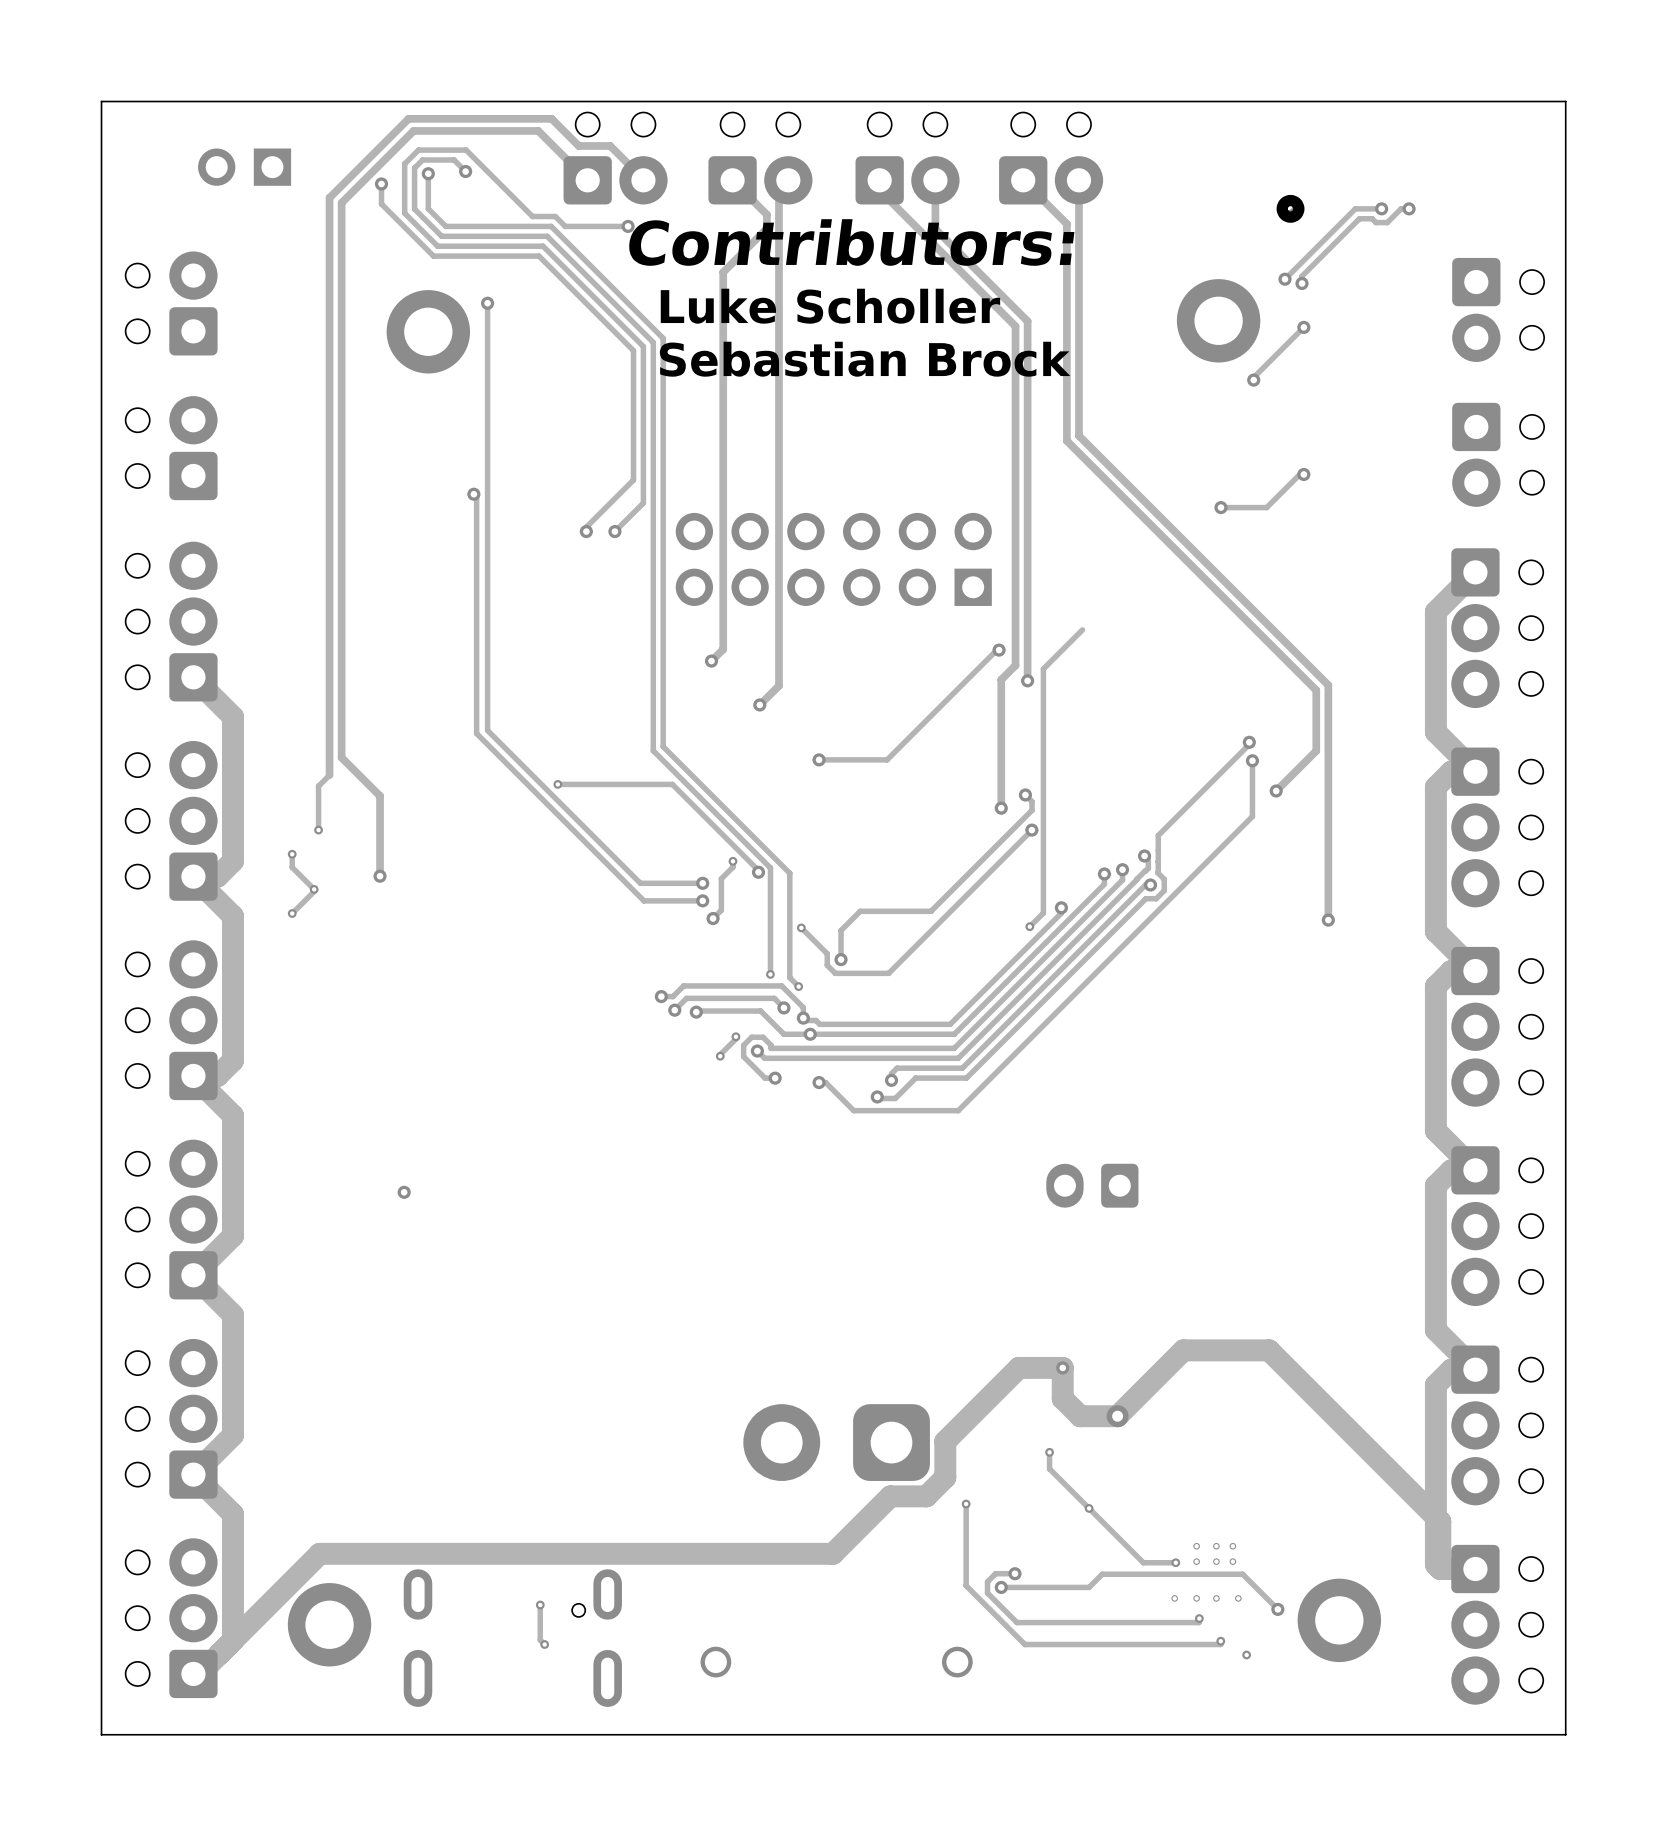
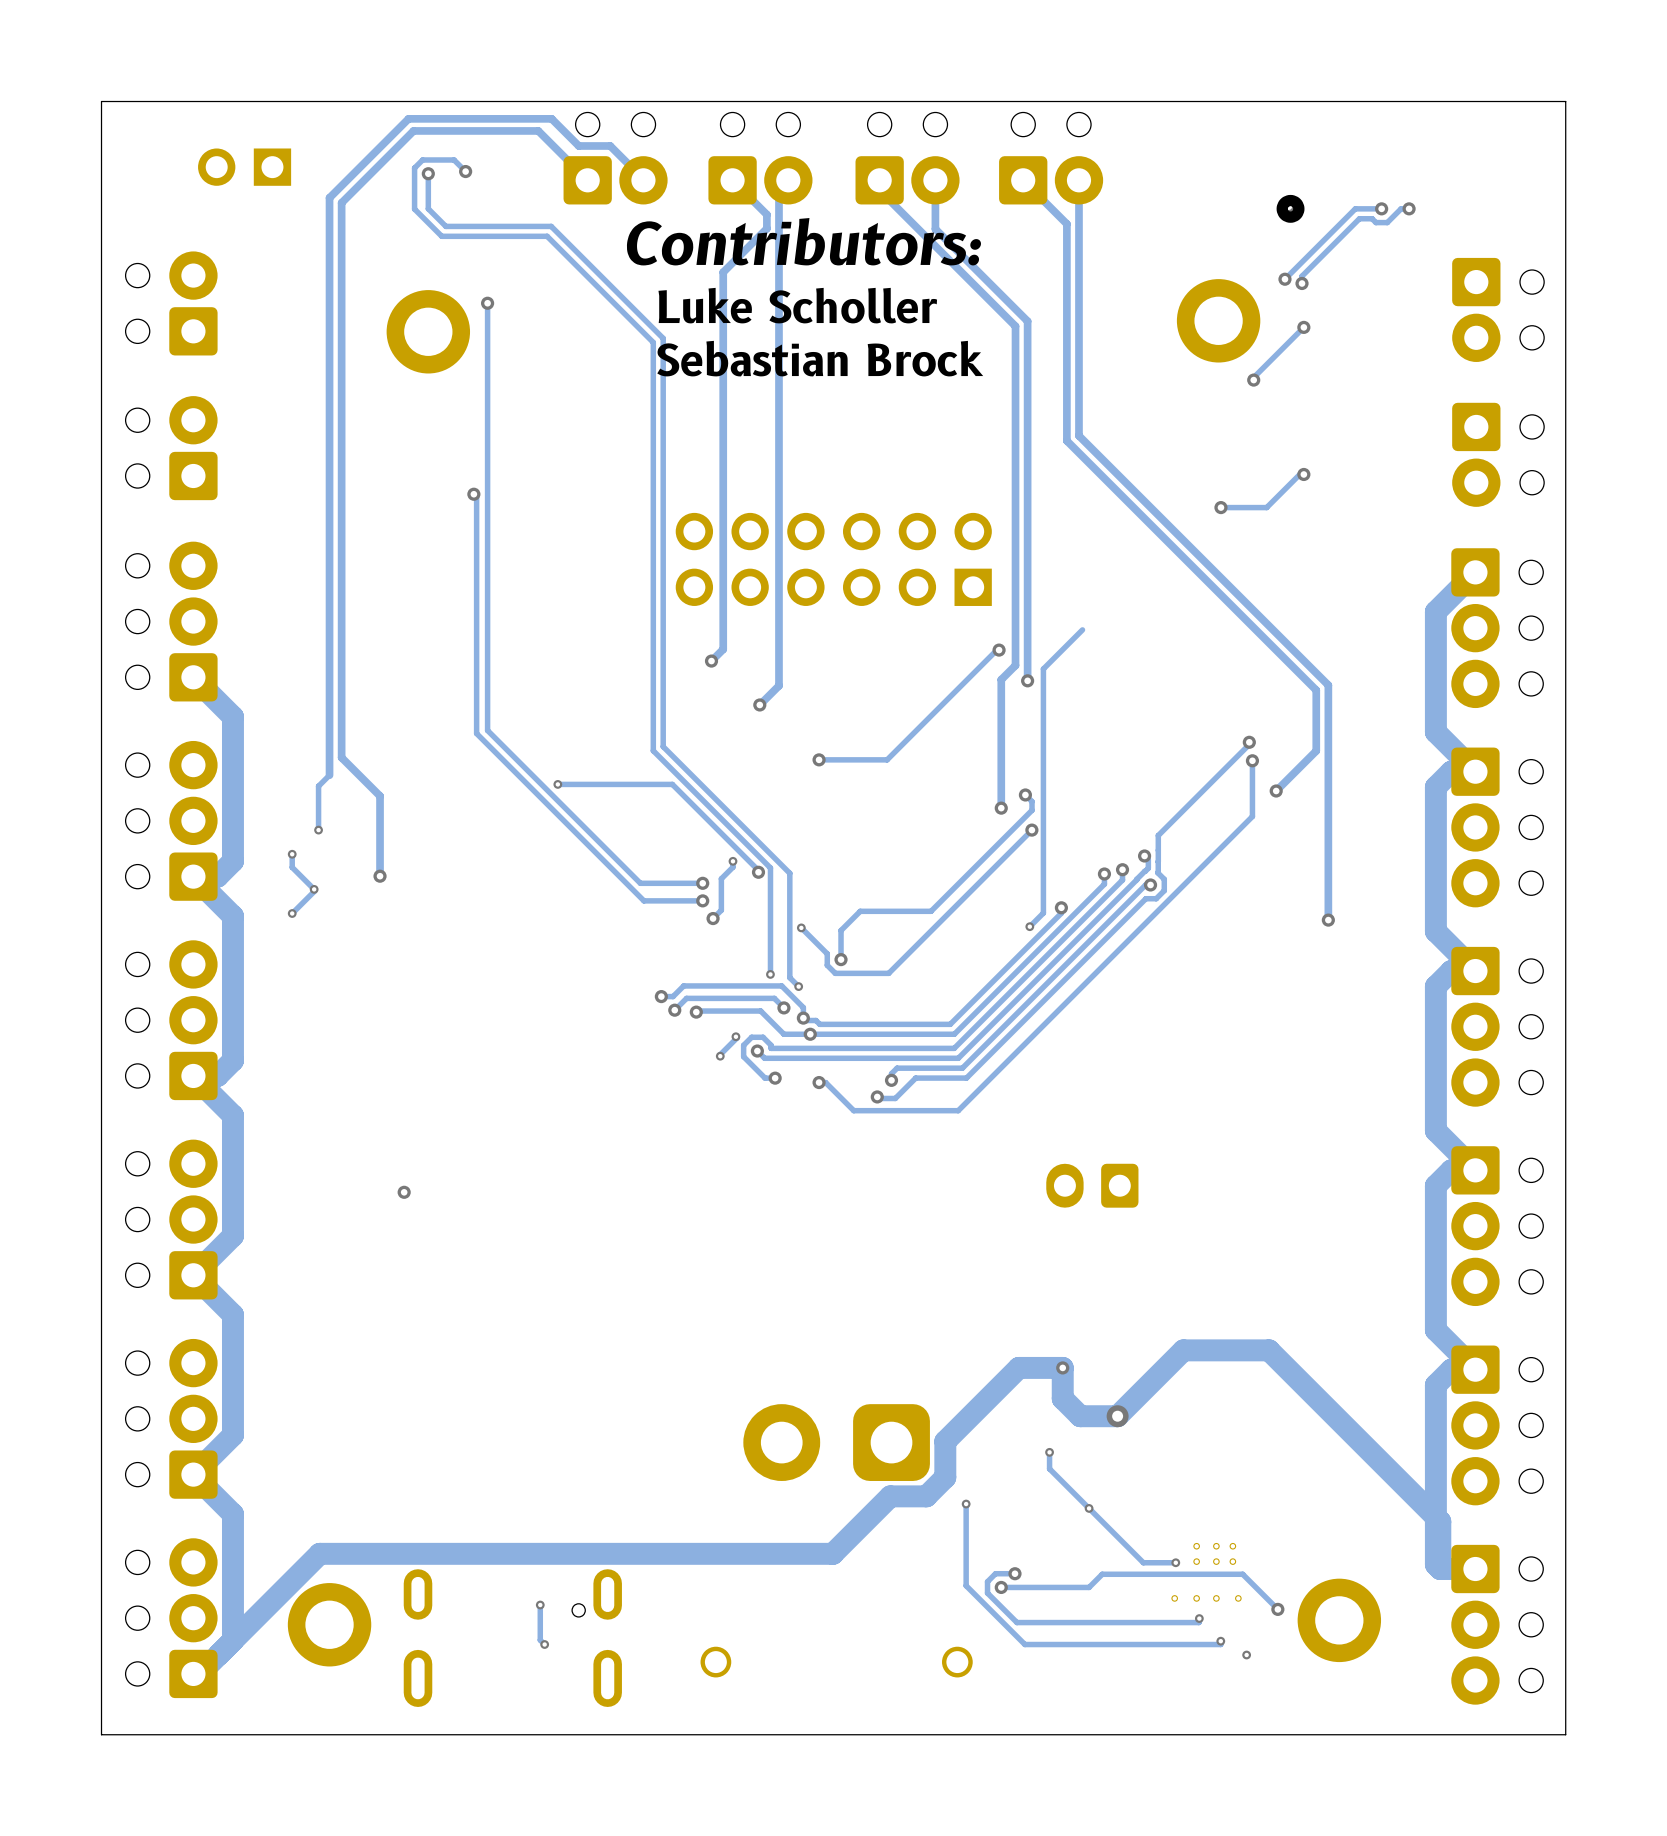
track: (381, 183) (381, 204) (433, 256) (538, 256) (633, 350) (633, 480) (586, 527) (586, 531) -> none
via: (381, 183) -> none
track: (628, 226) (565, 226) (555, 216) (532, 216) (466, 150) (418, 150) (404, 163) (404, 213) (437, 246) (543, 246) (643, 346) (643, 503) (614, 531) -> none
via: (628, 226) -> none
via: (586, 531) -> none
via: (614, 531) -> none

